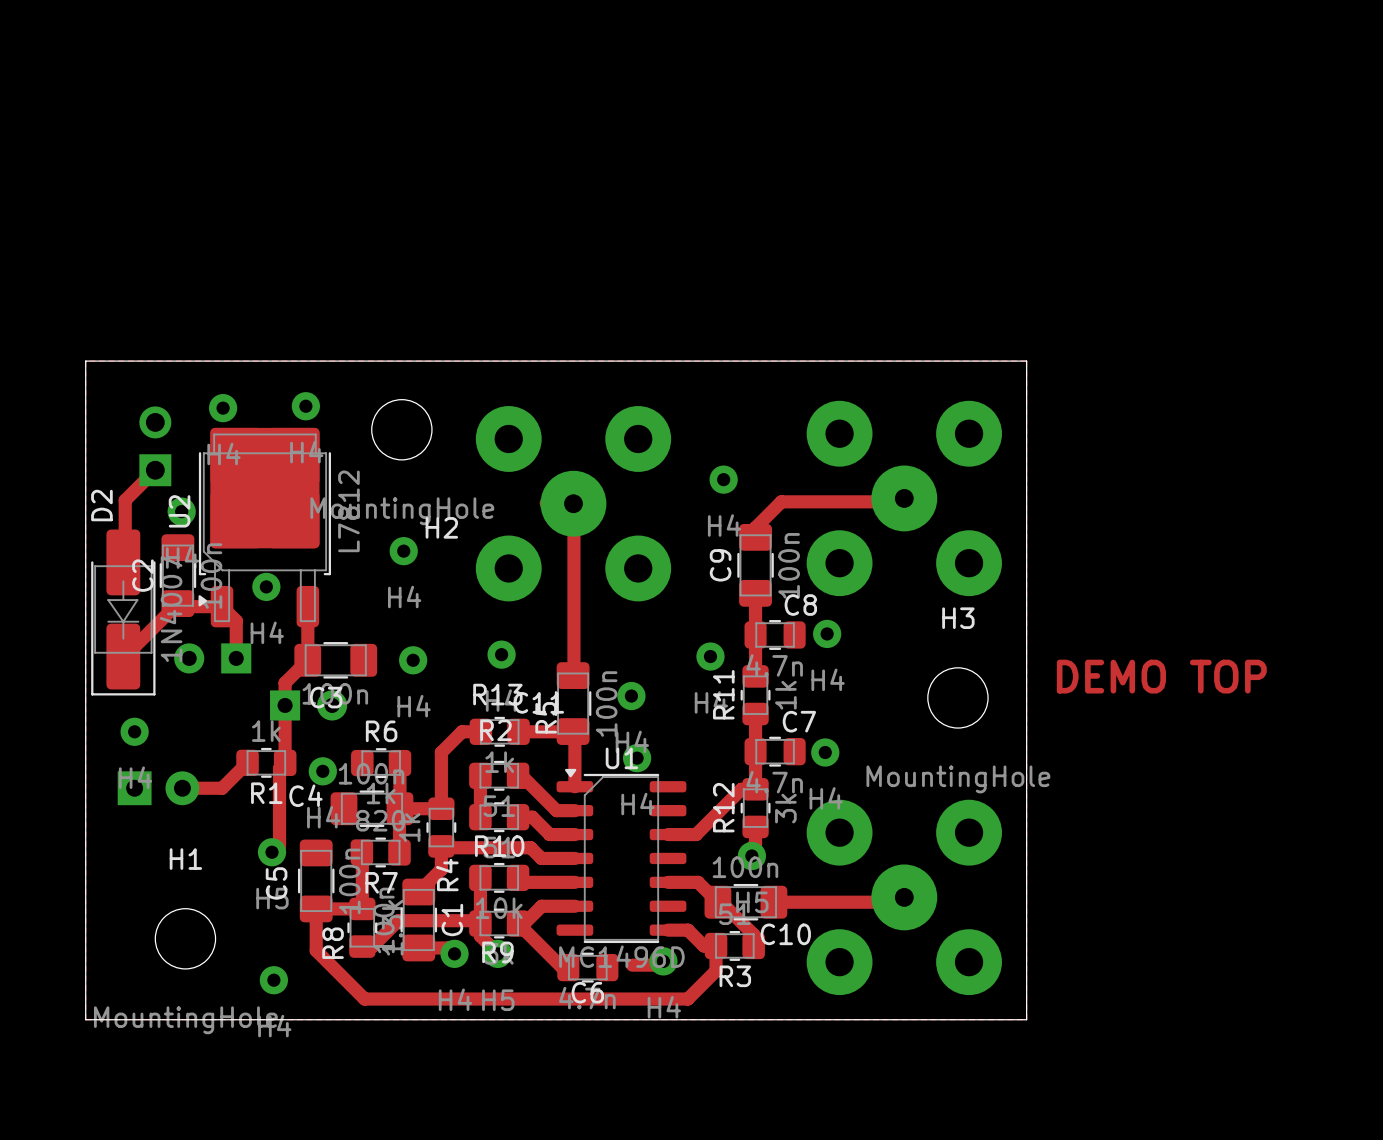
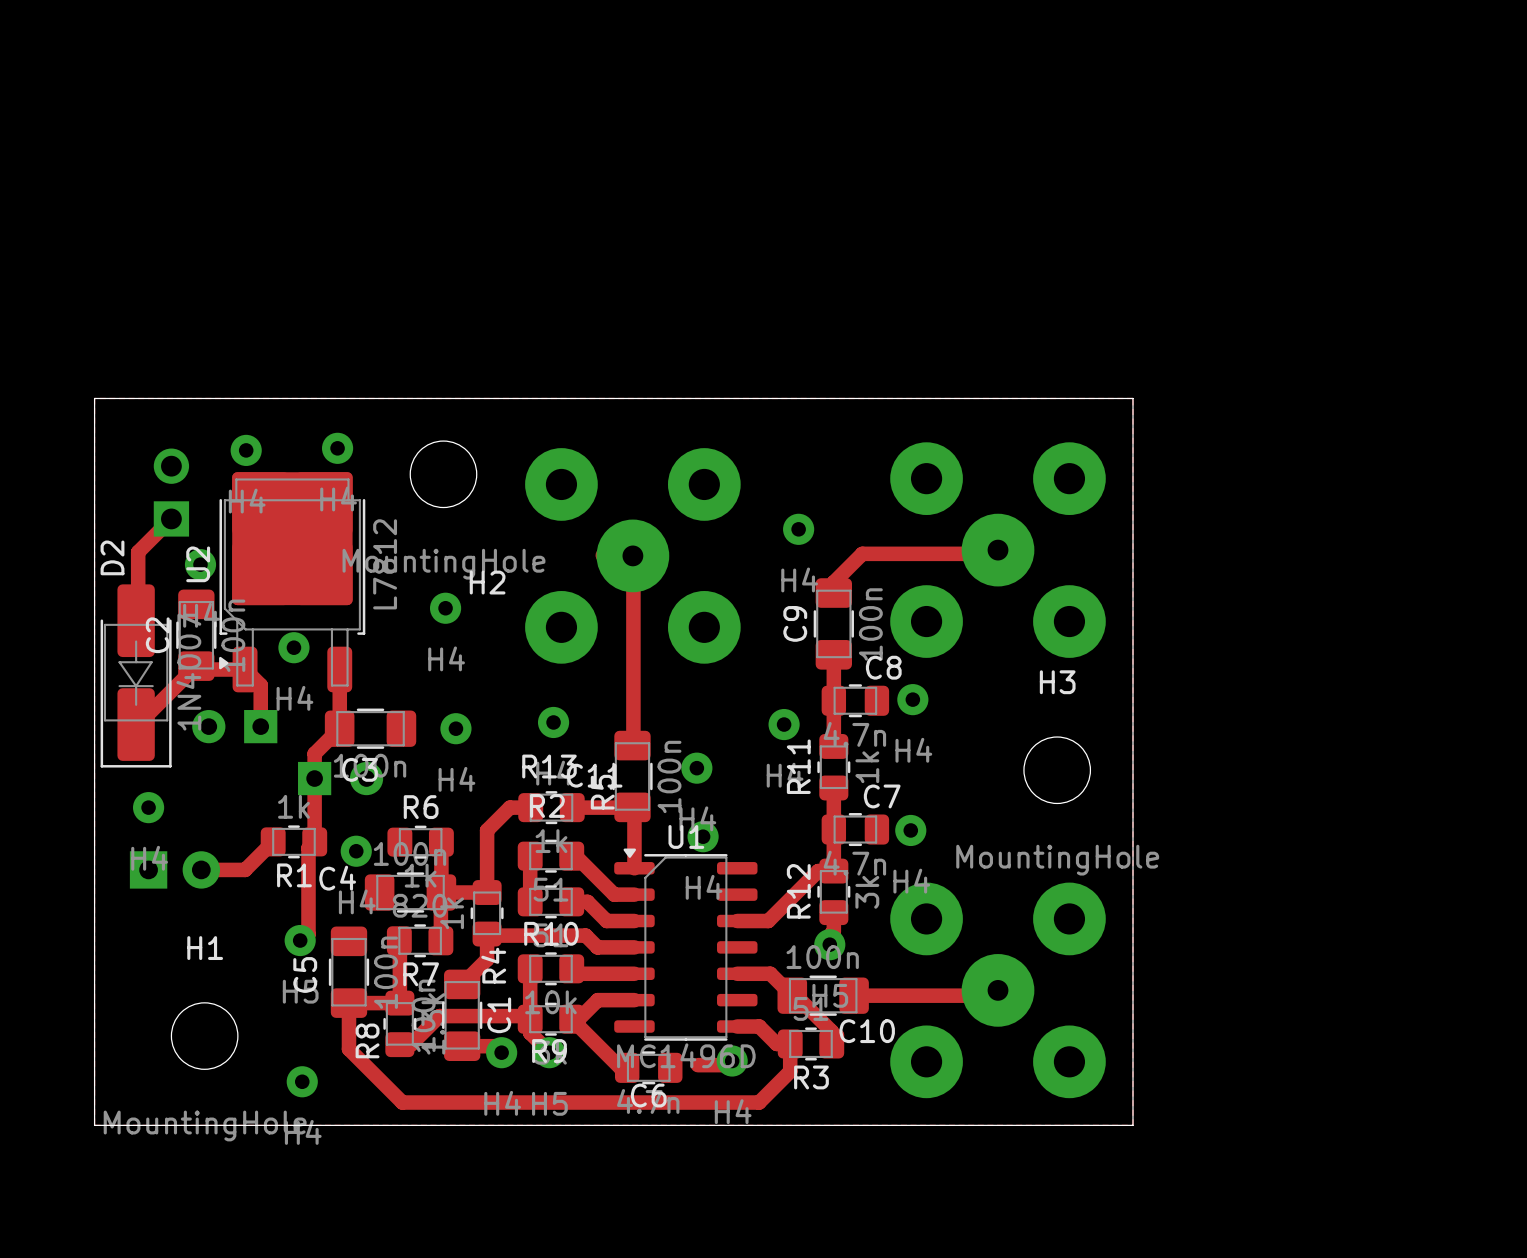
text: DEMO TOP (1161, 676) -> none

